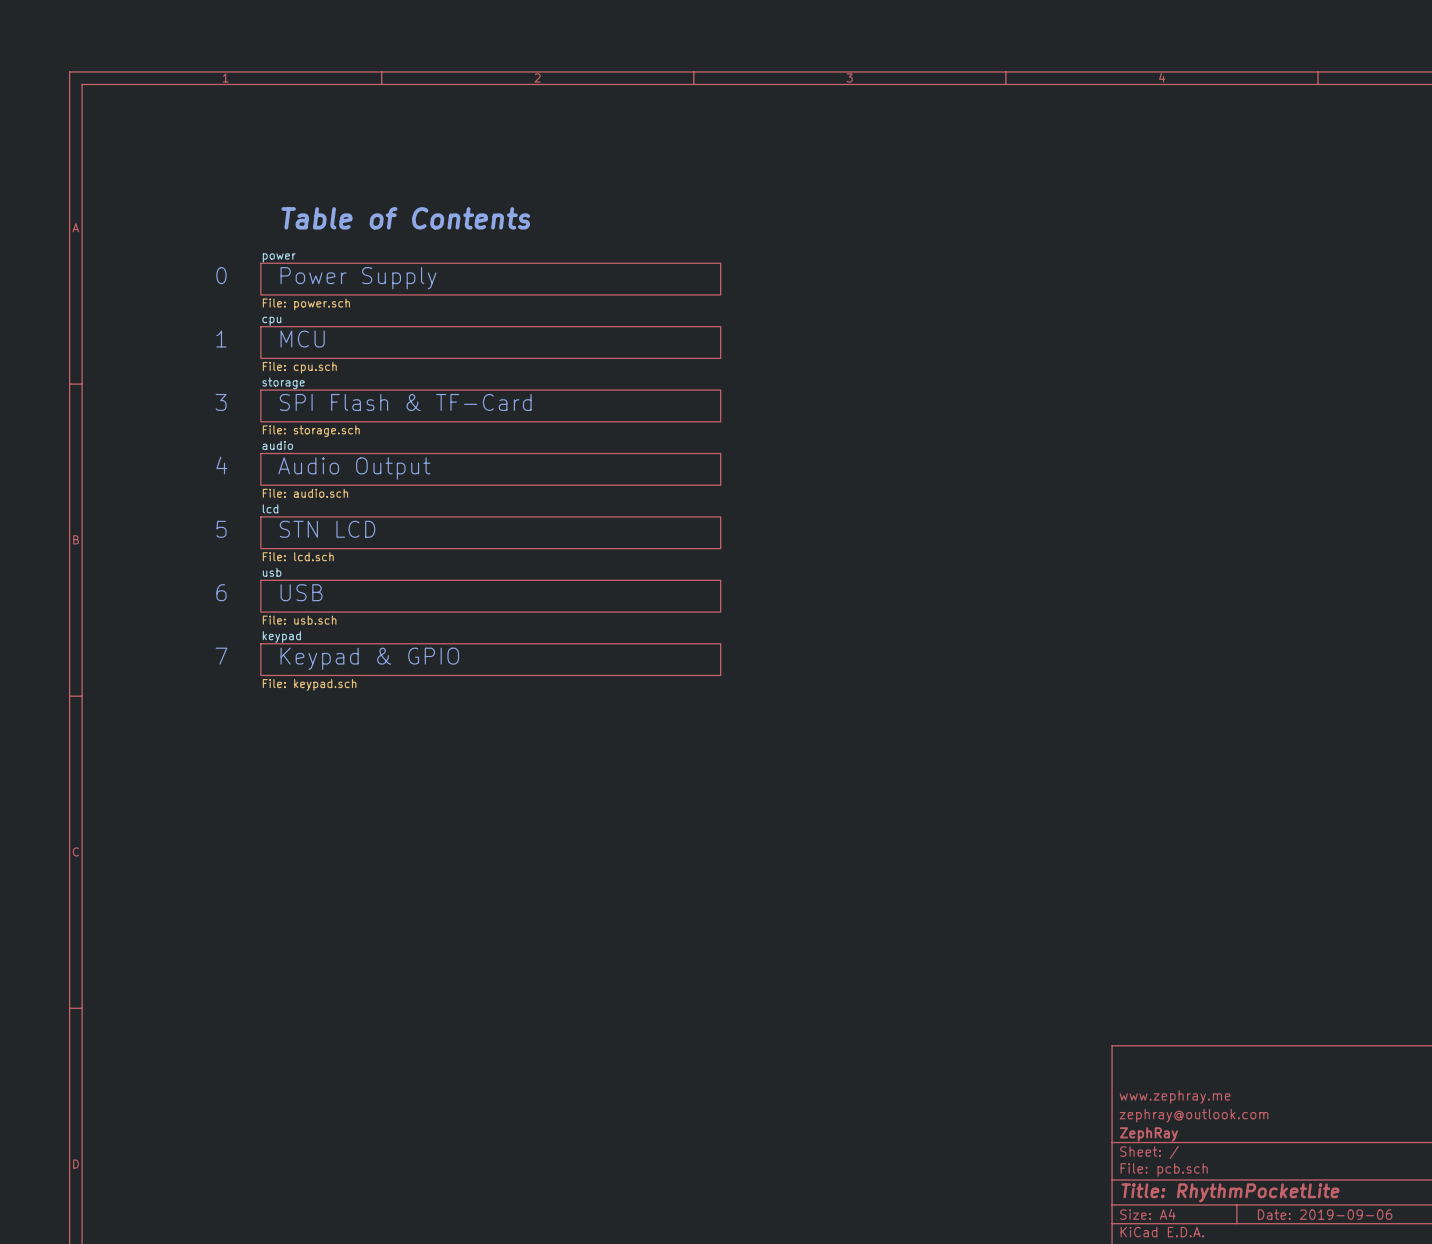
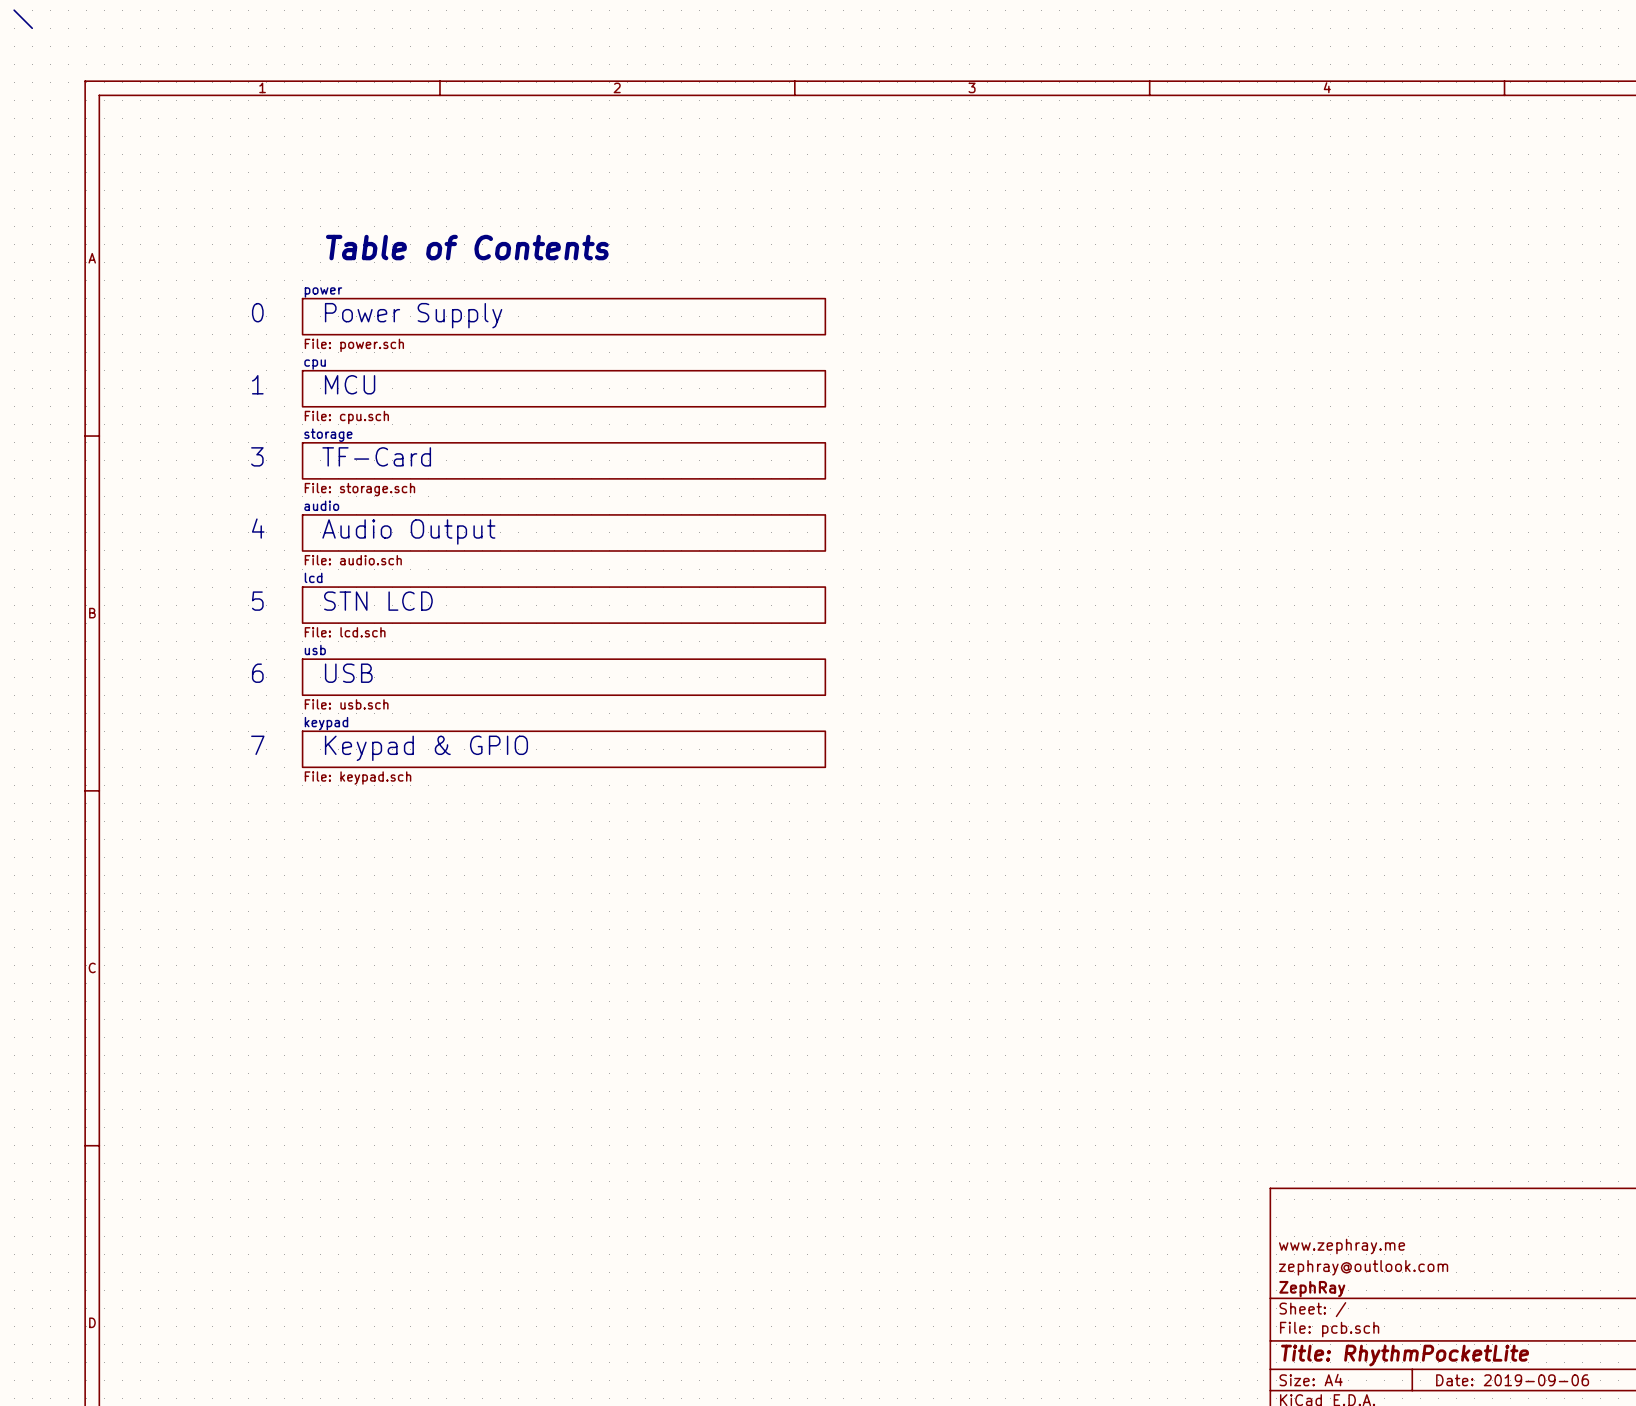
wire: none -> (14, 10) (32, 28)
text: SPI Flash & TF-Card (405, 402) -> TF-Card (376, 456)

